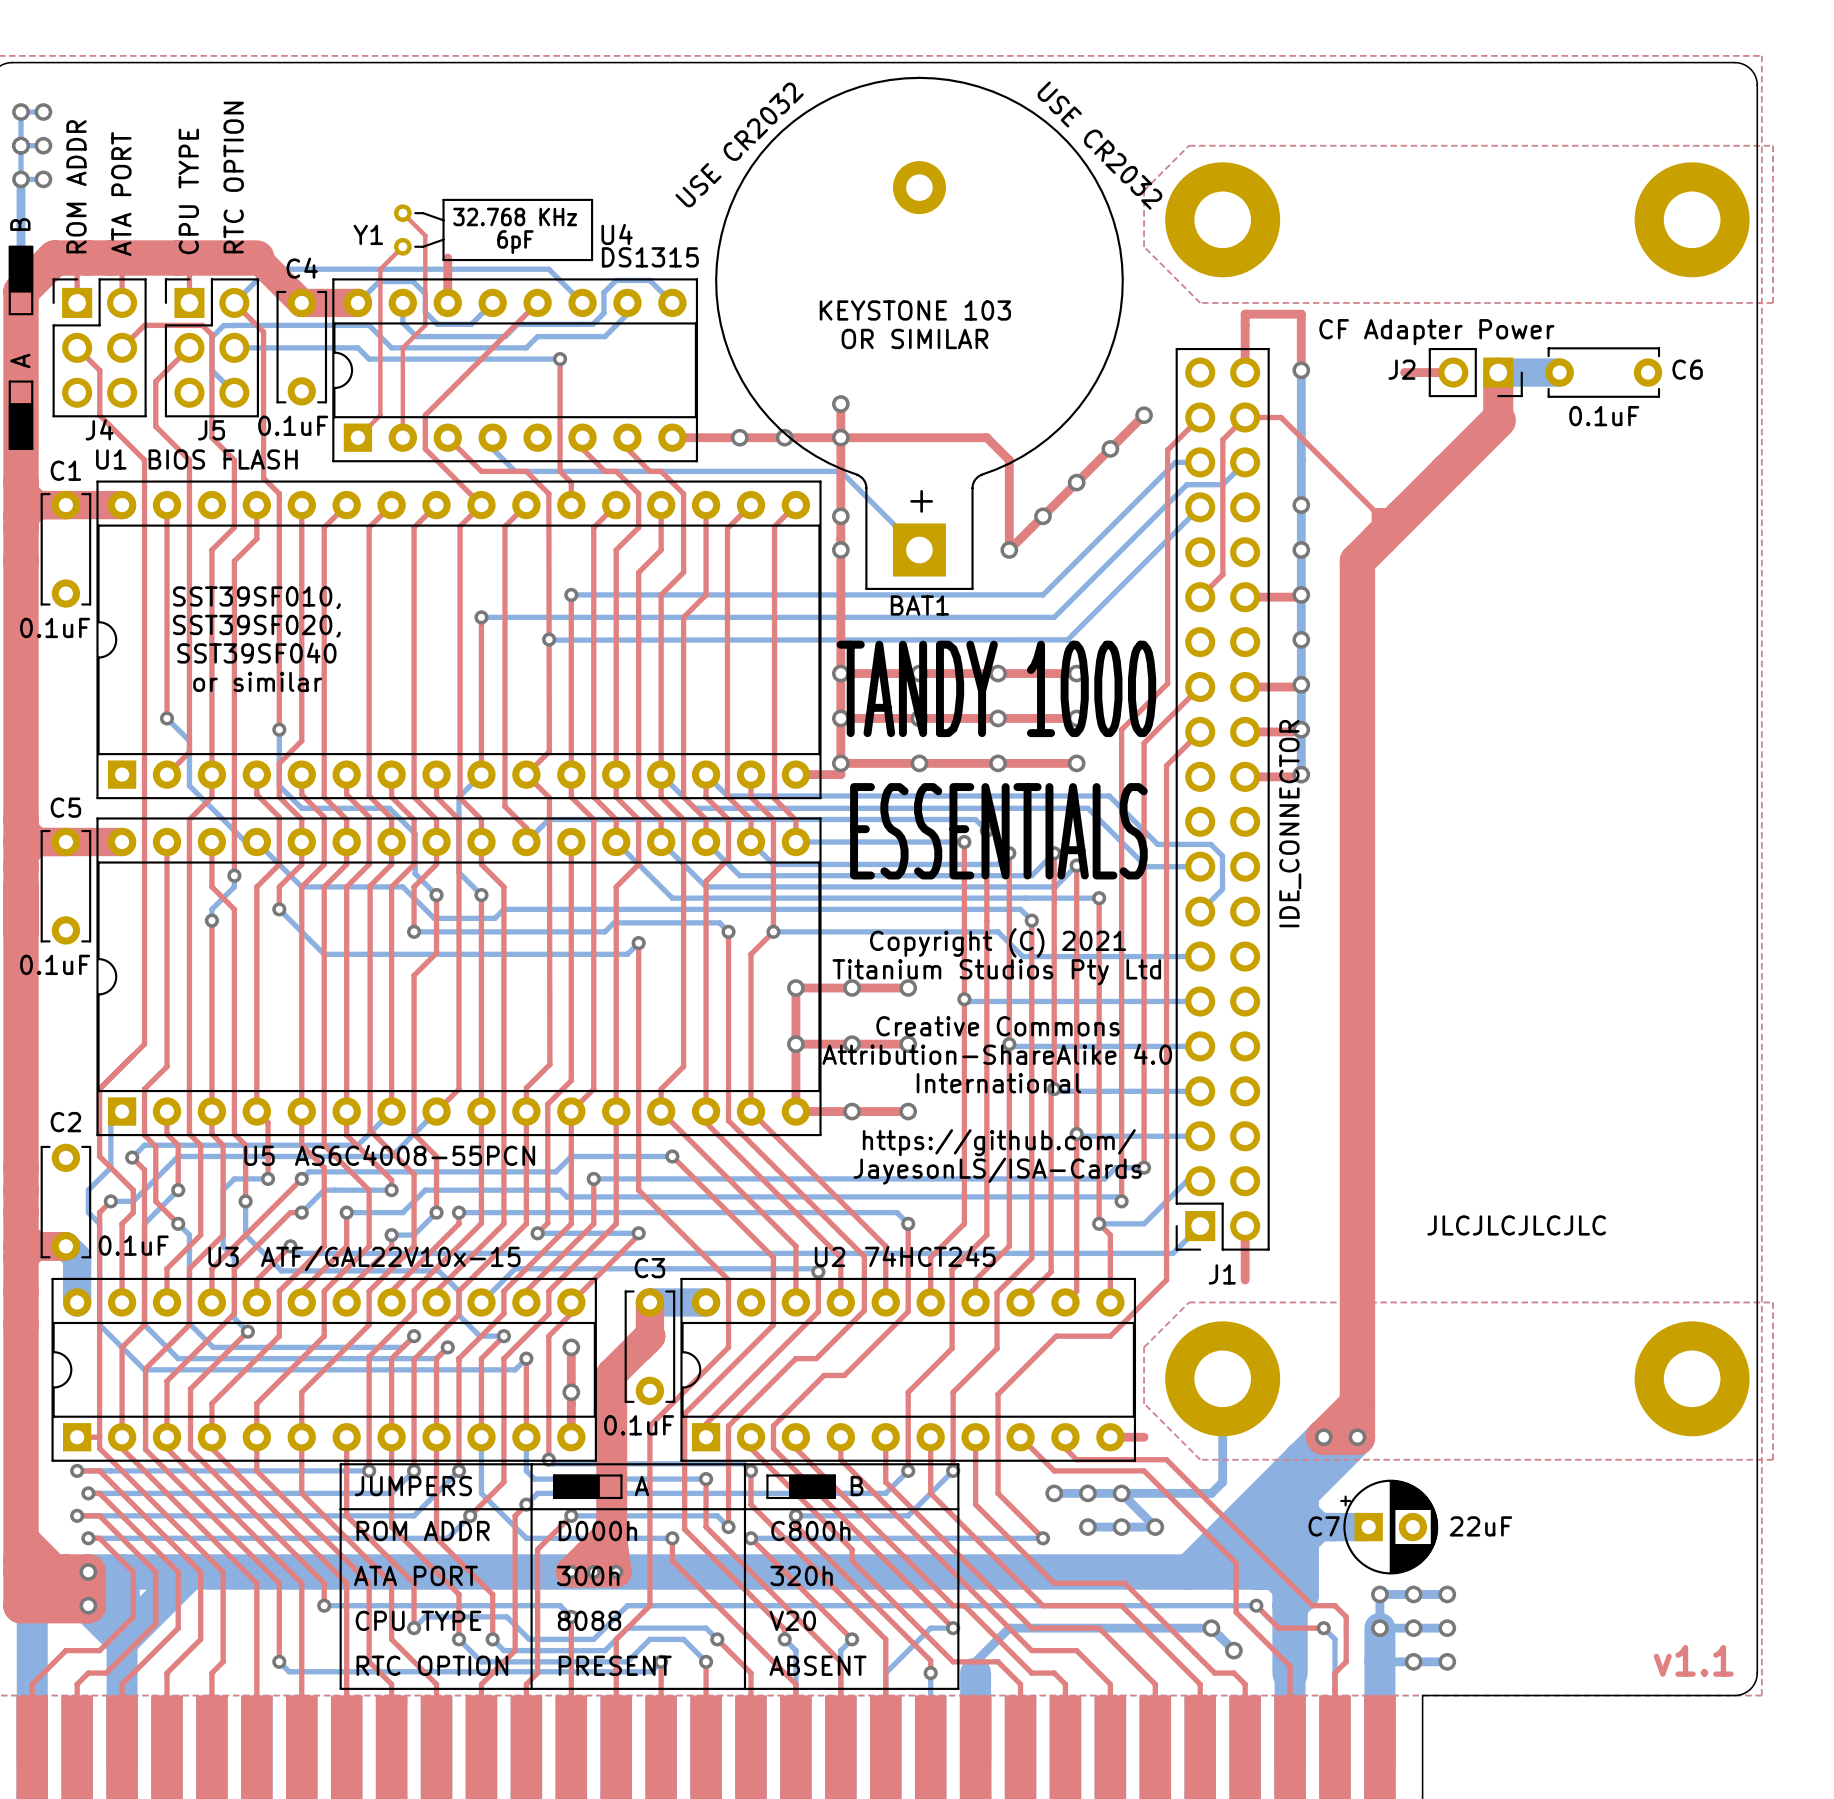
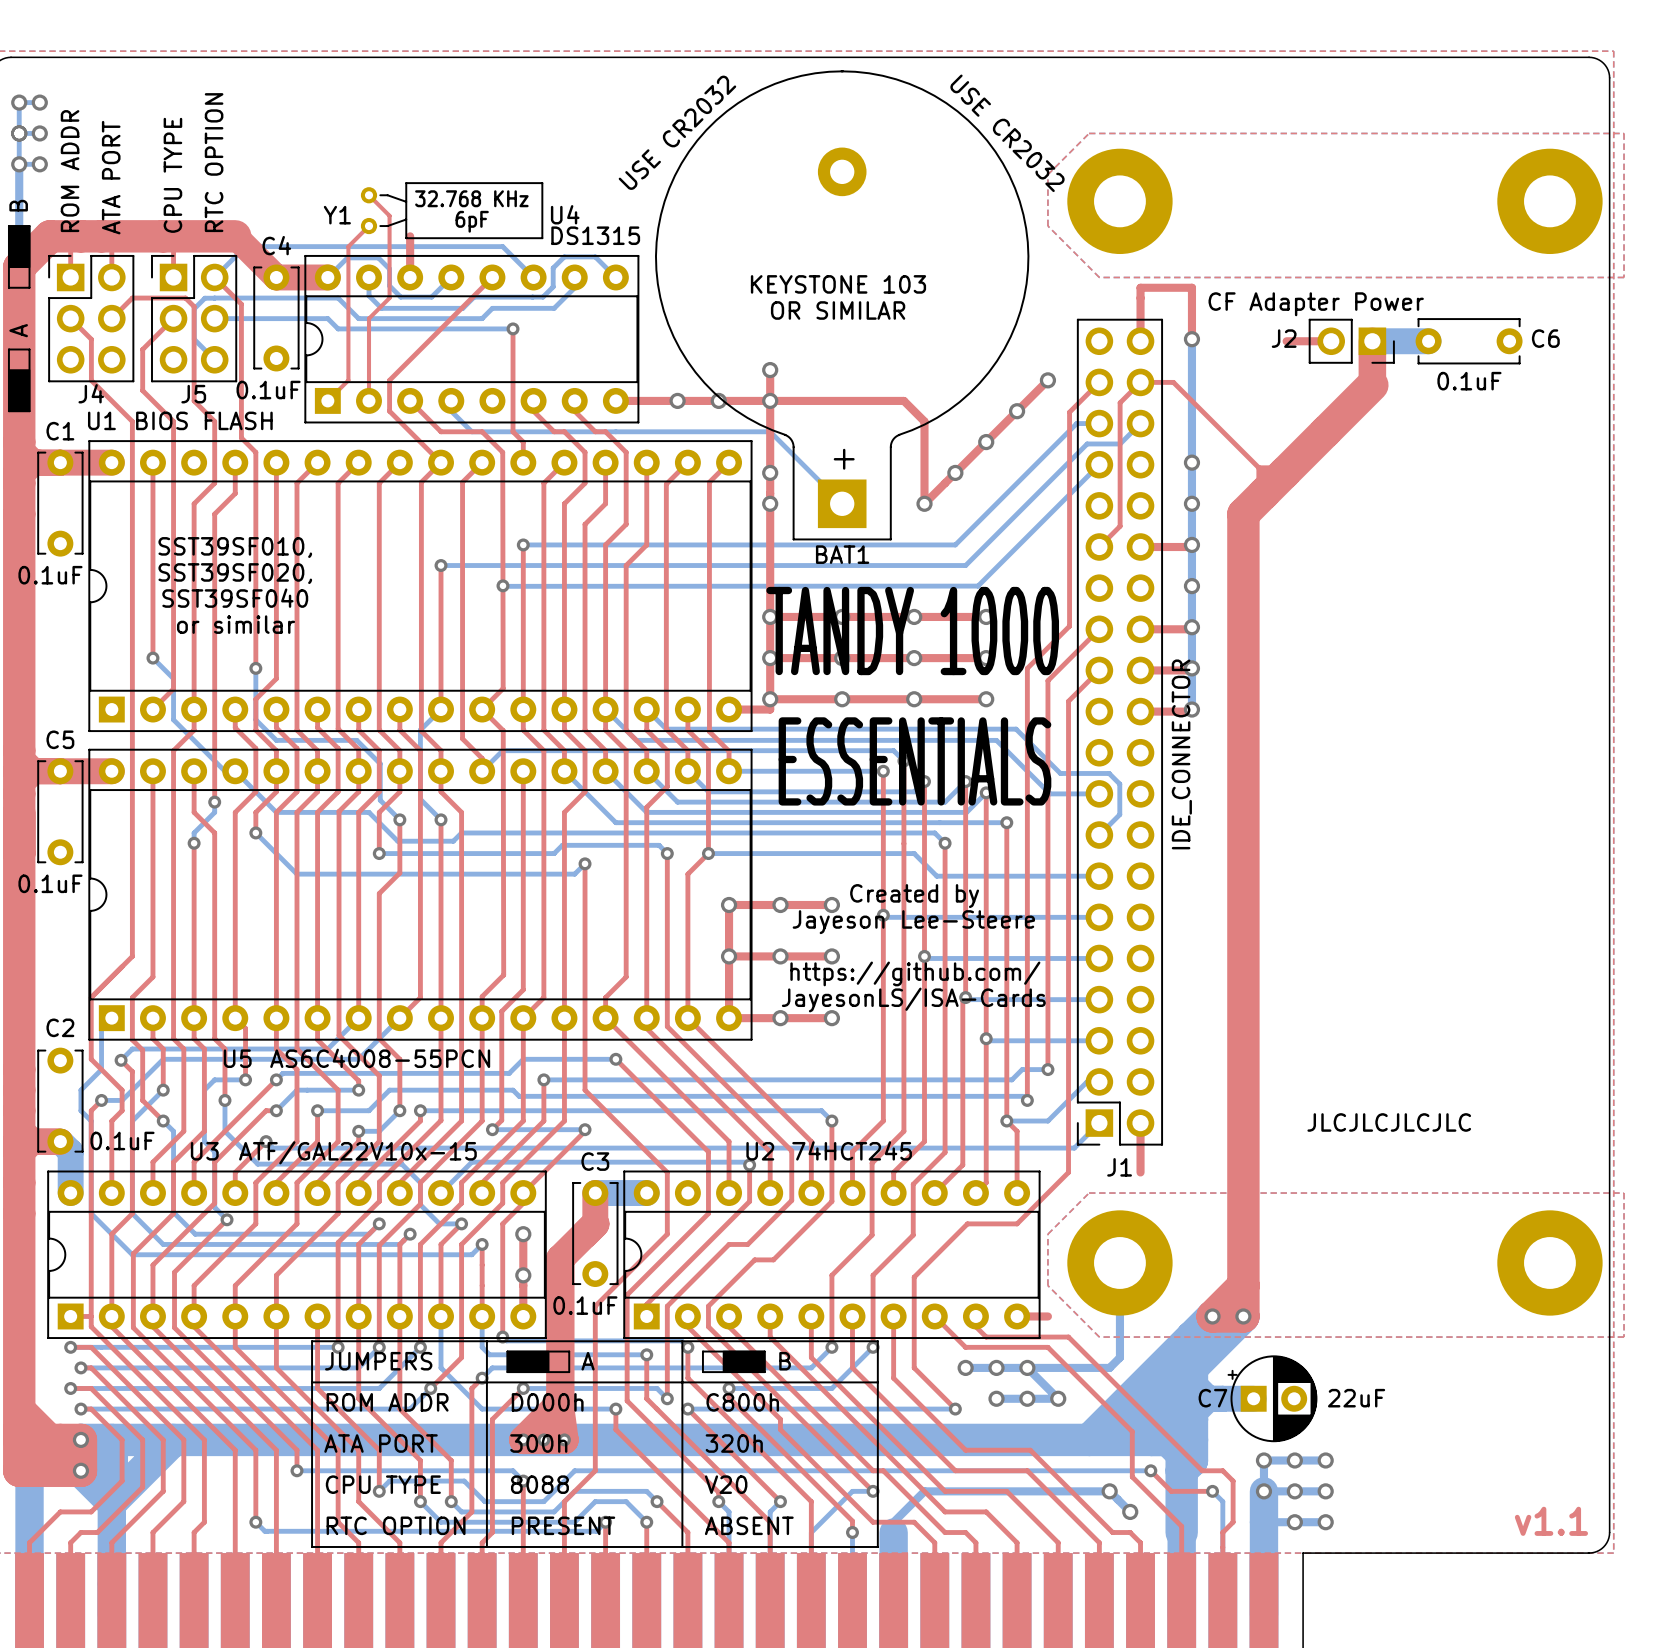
text: Copyright (C) 2021 (998, 942) -> none
text: Titanium Studios Pty Ltd (996, 972) -> Created by (914, 896)
text: none -> Jayeson Lee-Steere (913, 922)
text: Creative Commons (998, 1026) -> none
text: Attribution-ShareAlike 4.0 (997, 1054) -> https://github.com/ (915, 973)
text: International (998, 1083) -> JayesonLS/ISA-Cards (913, 1000)
text: https://github.com/ (999, 1142) -> none
text: JayesonLS/ISA-Cards (997, 1171) -> none

